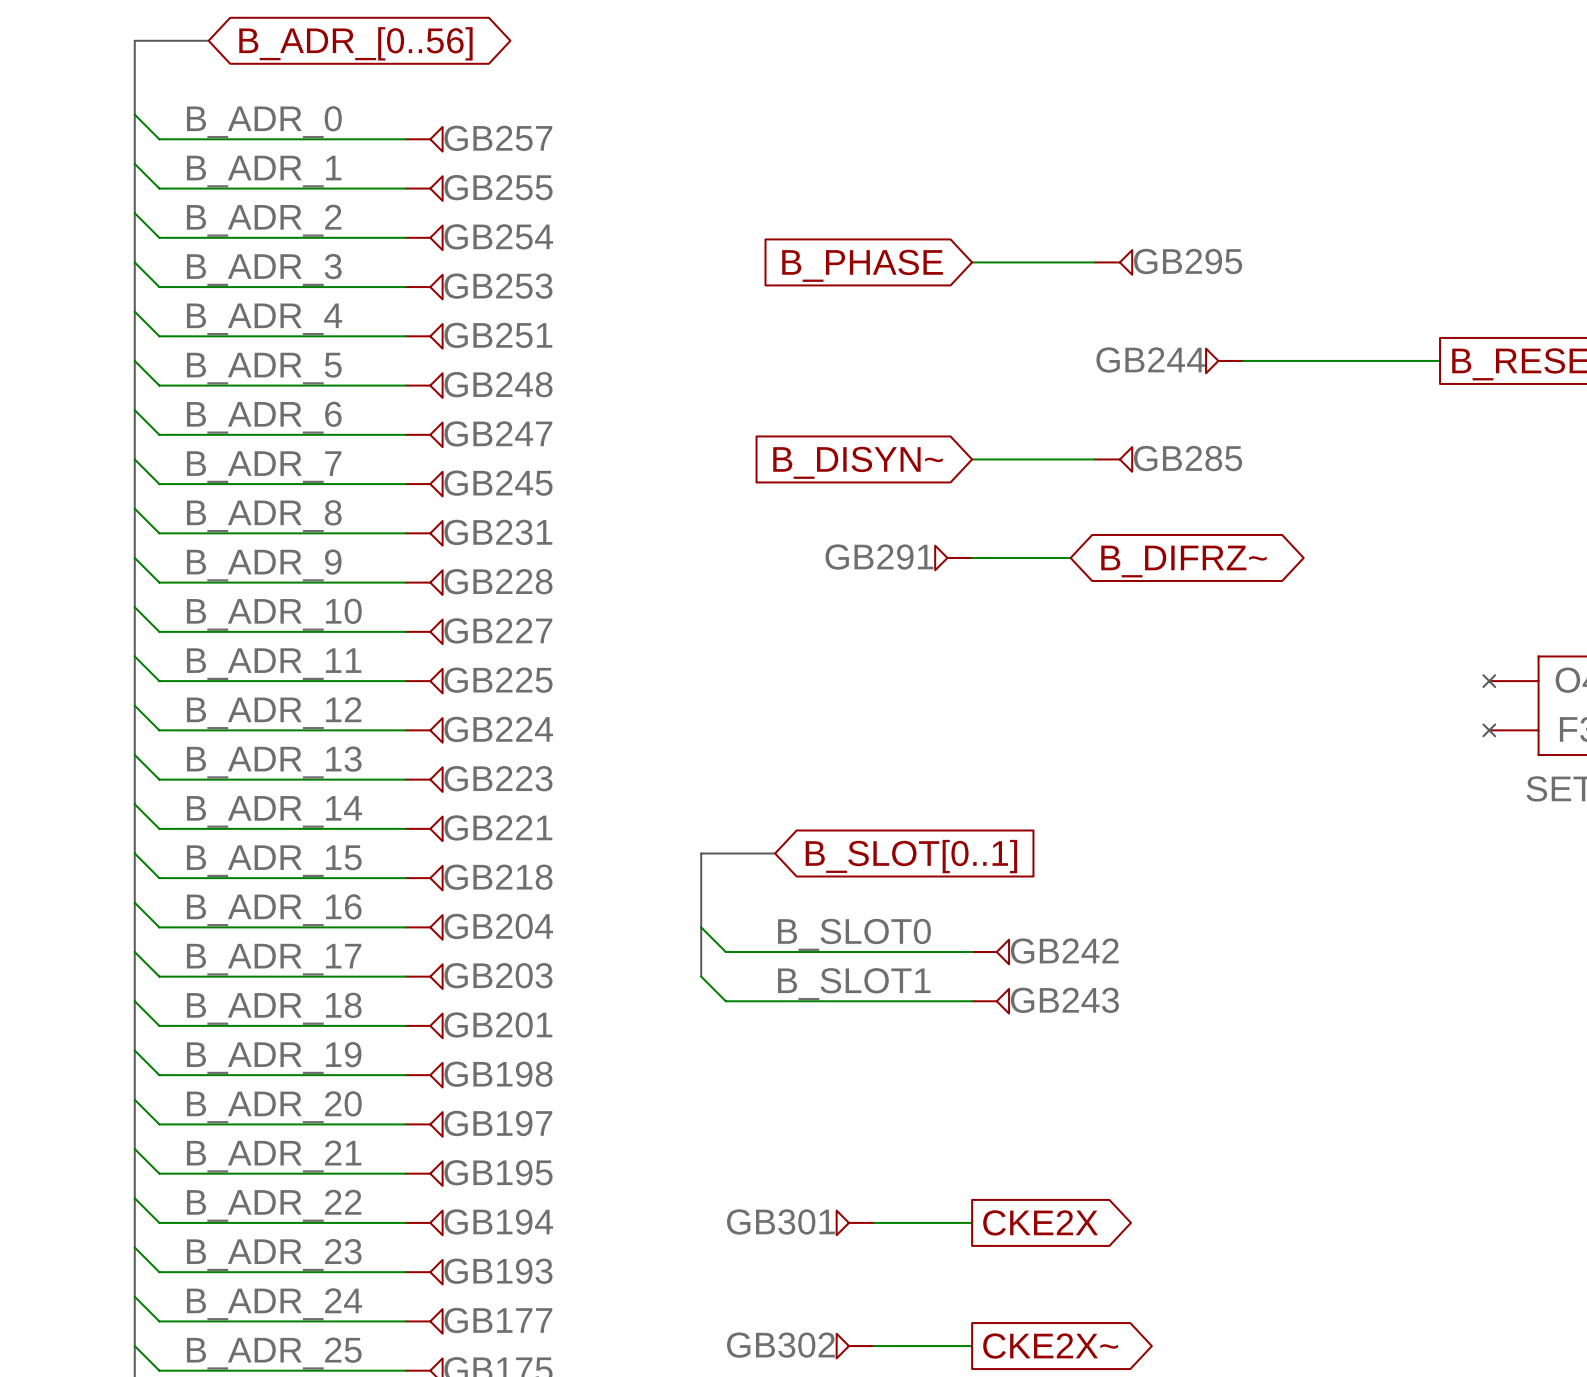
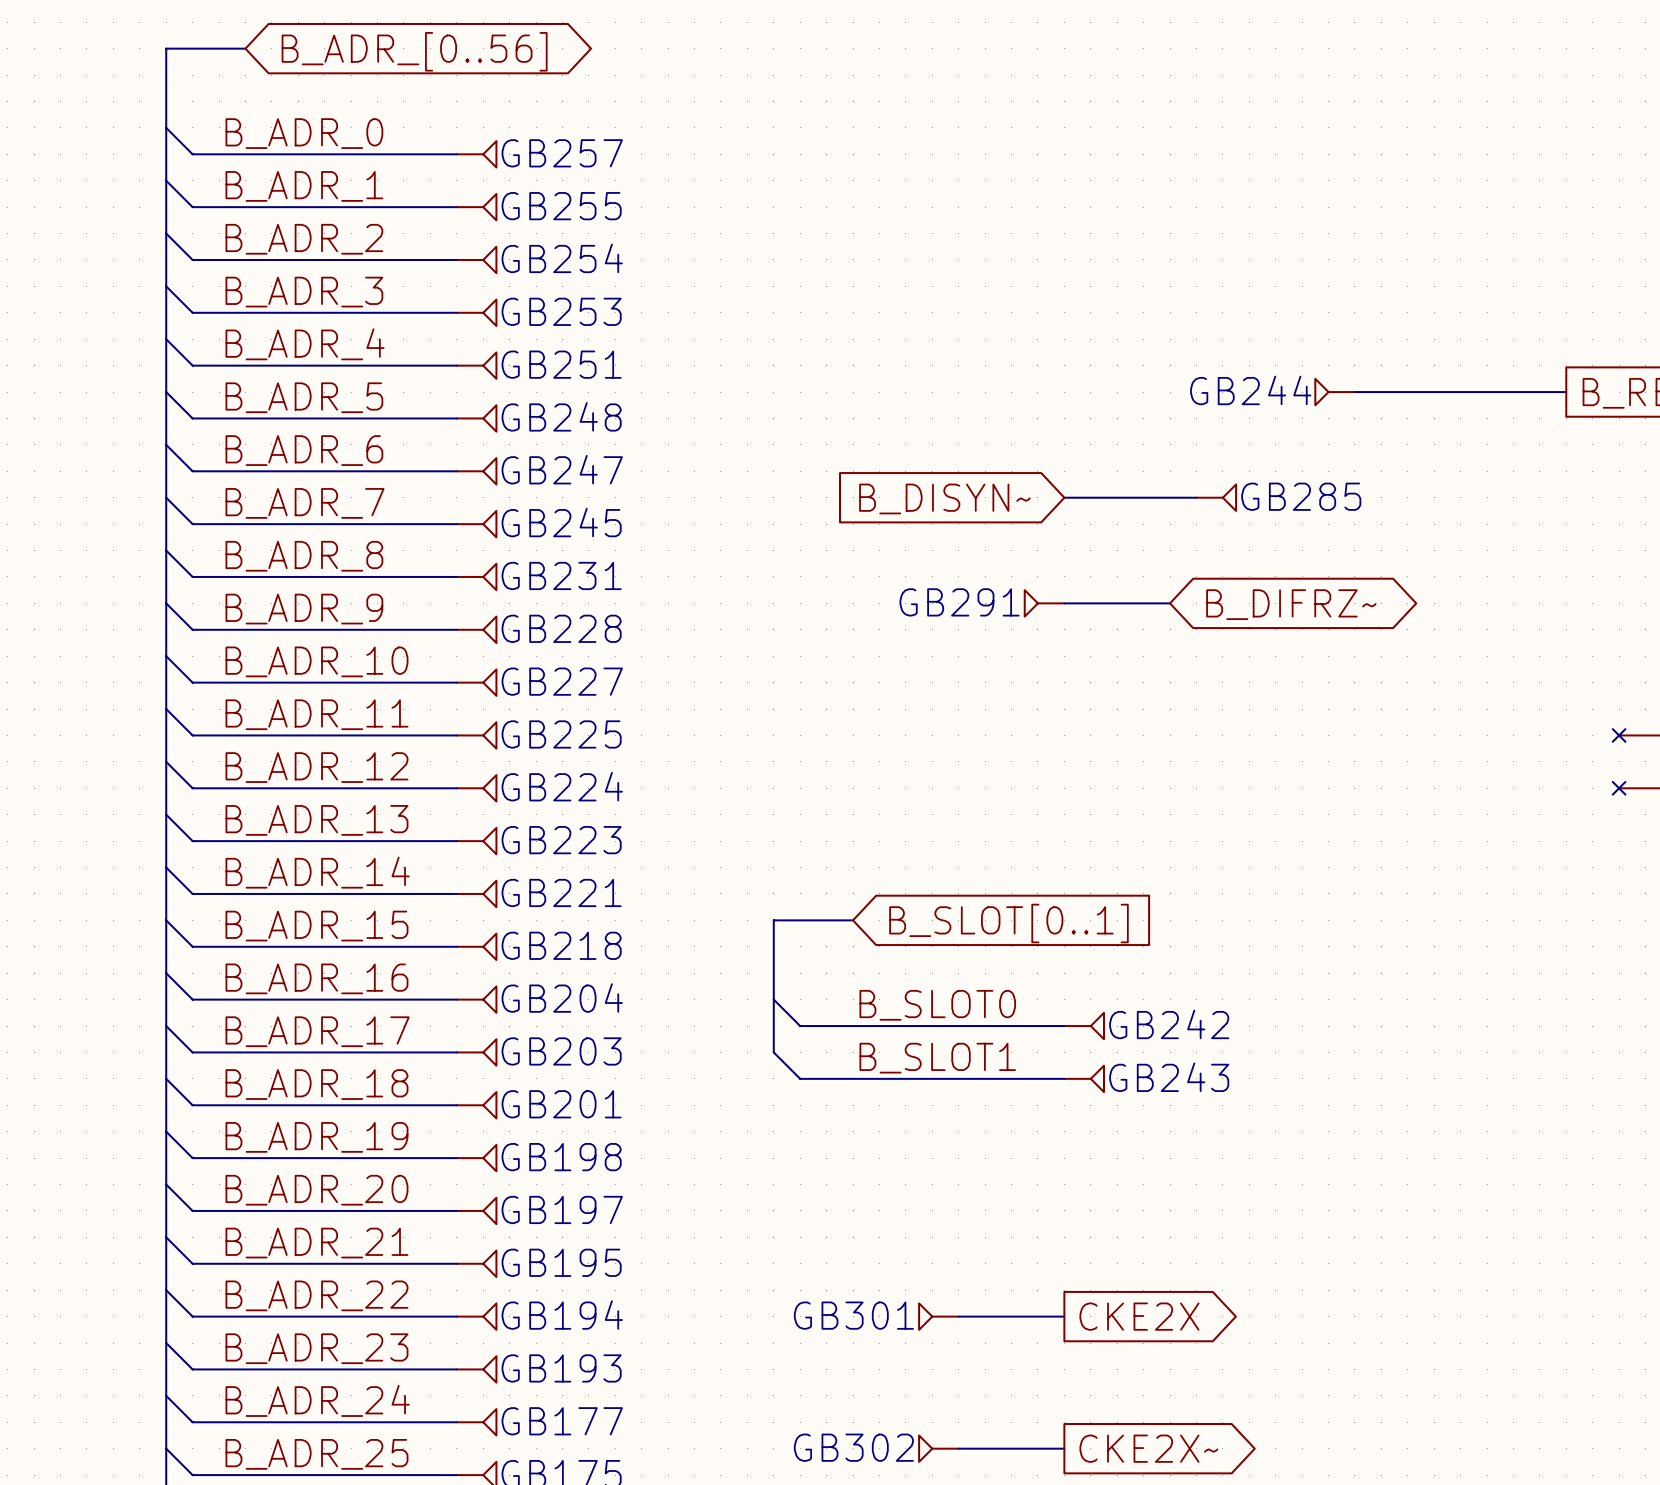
wire: (972, 262) (1095, 262) -> none
GB295: (1114, 262) -> none
global label: B_PHASE (862, 265) -> none

